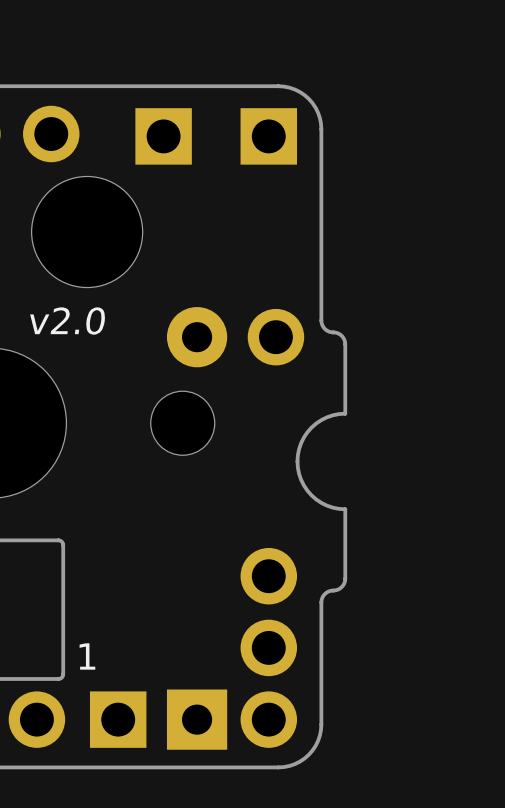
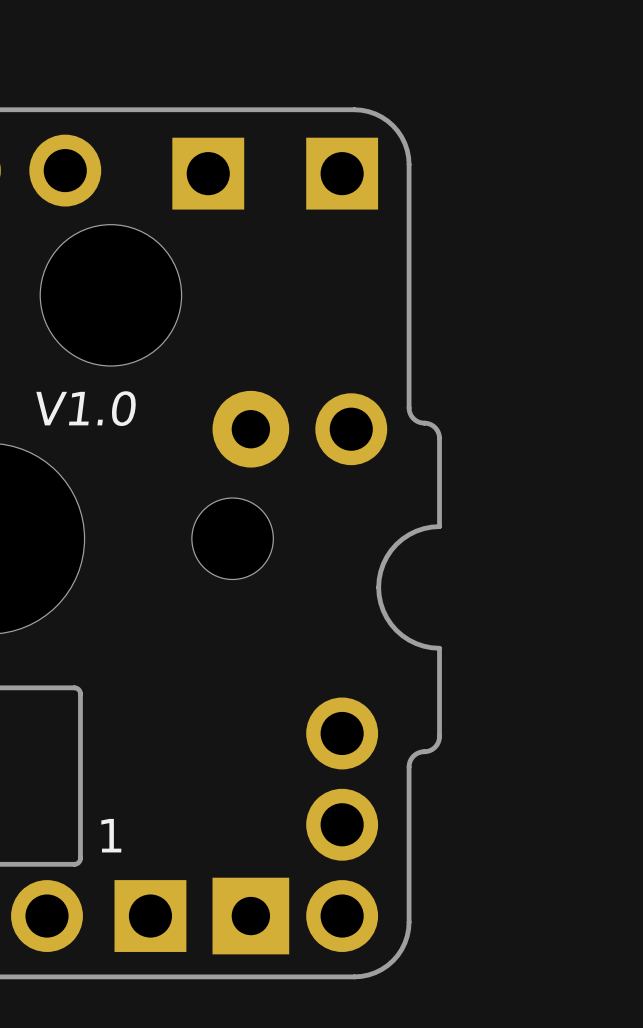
text: v2.0 (67, 321) -> V1.0 (86, 408)

